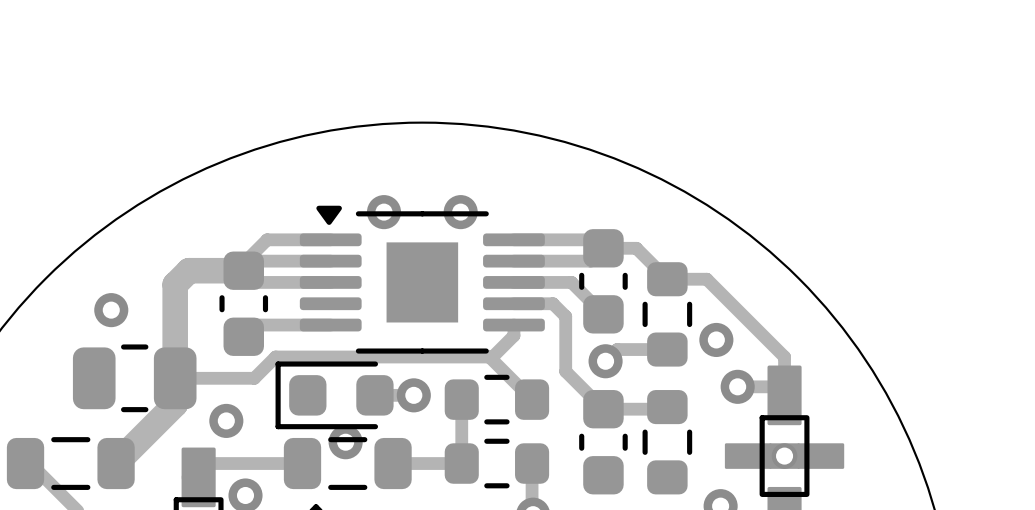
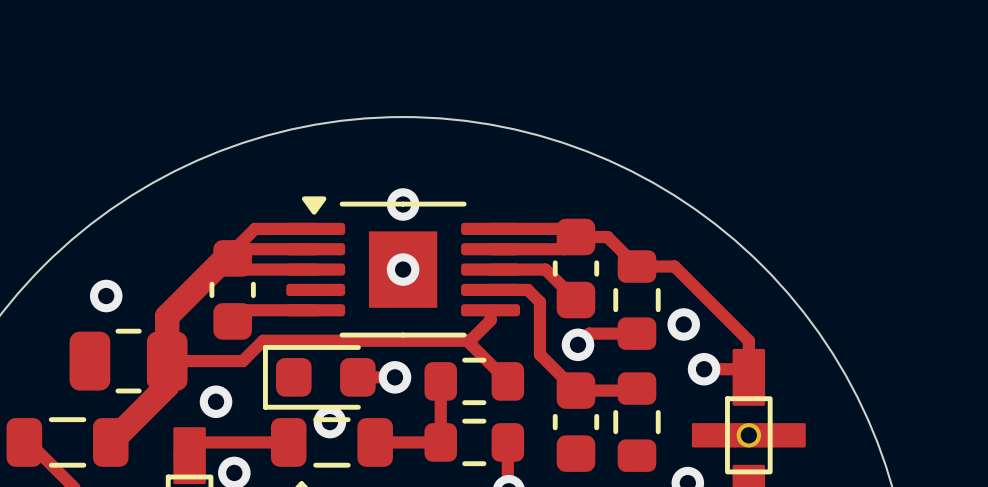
via: (383, 212) -> none
via: (460, 212) -> none
via: none -> (403, 204)
track: (235, 270) (189, 270) (175, 284) (175, 331) -> (225, 258) (167, 316)
via: none -> (403, 269)

